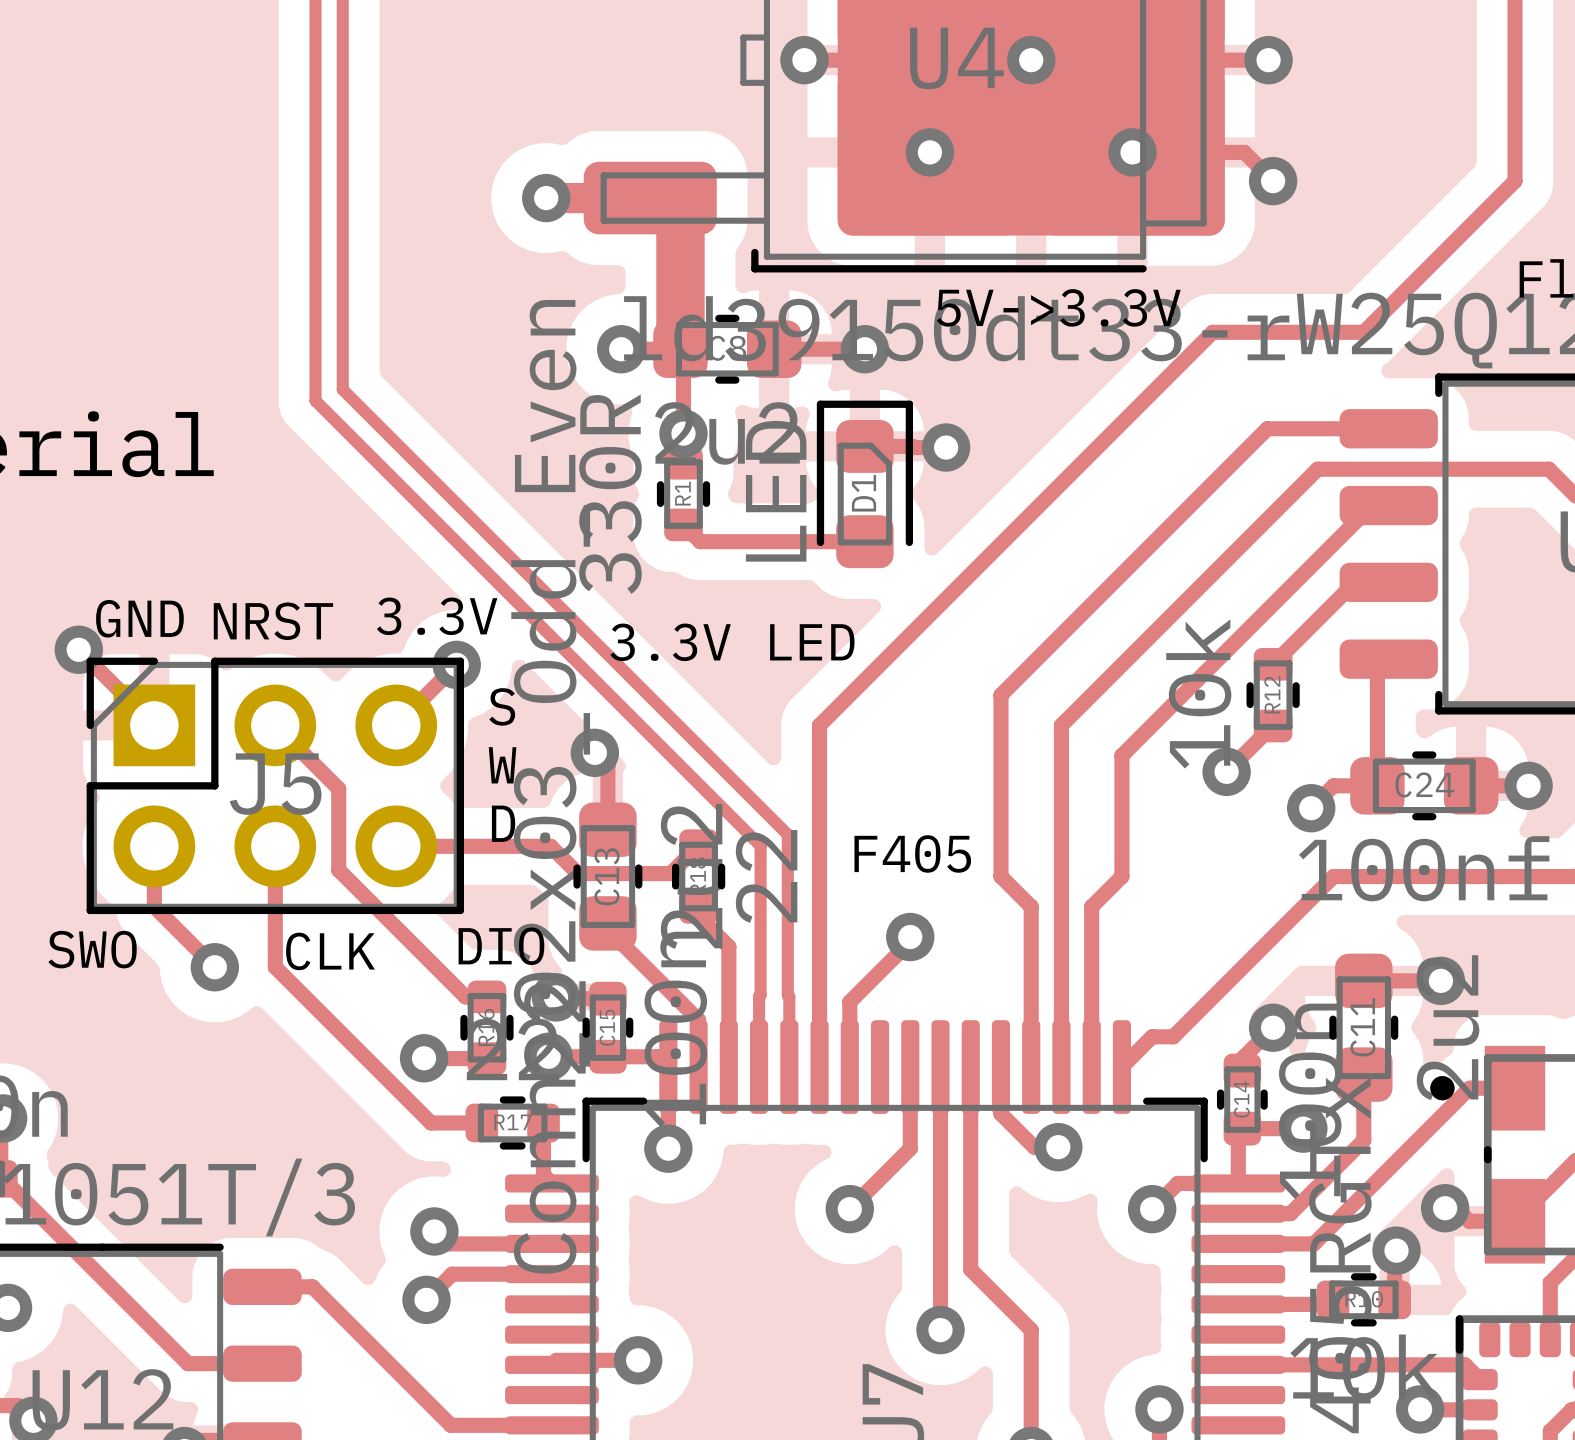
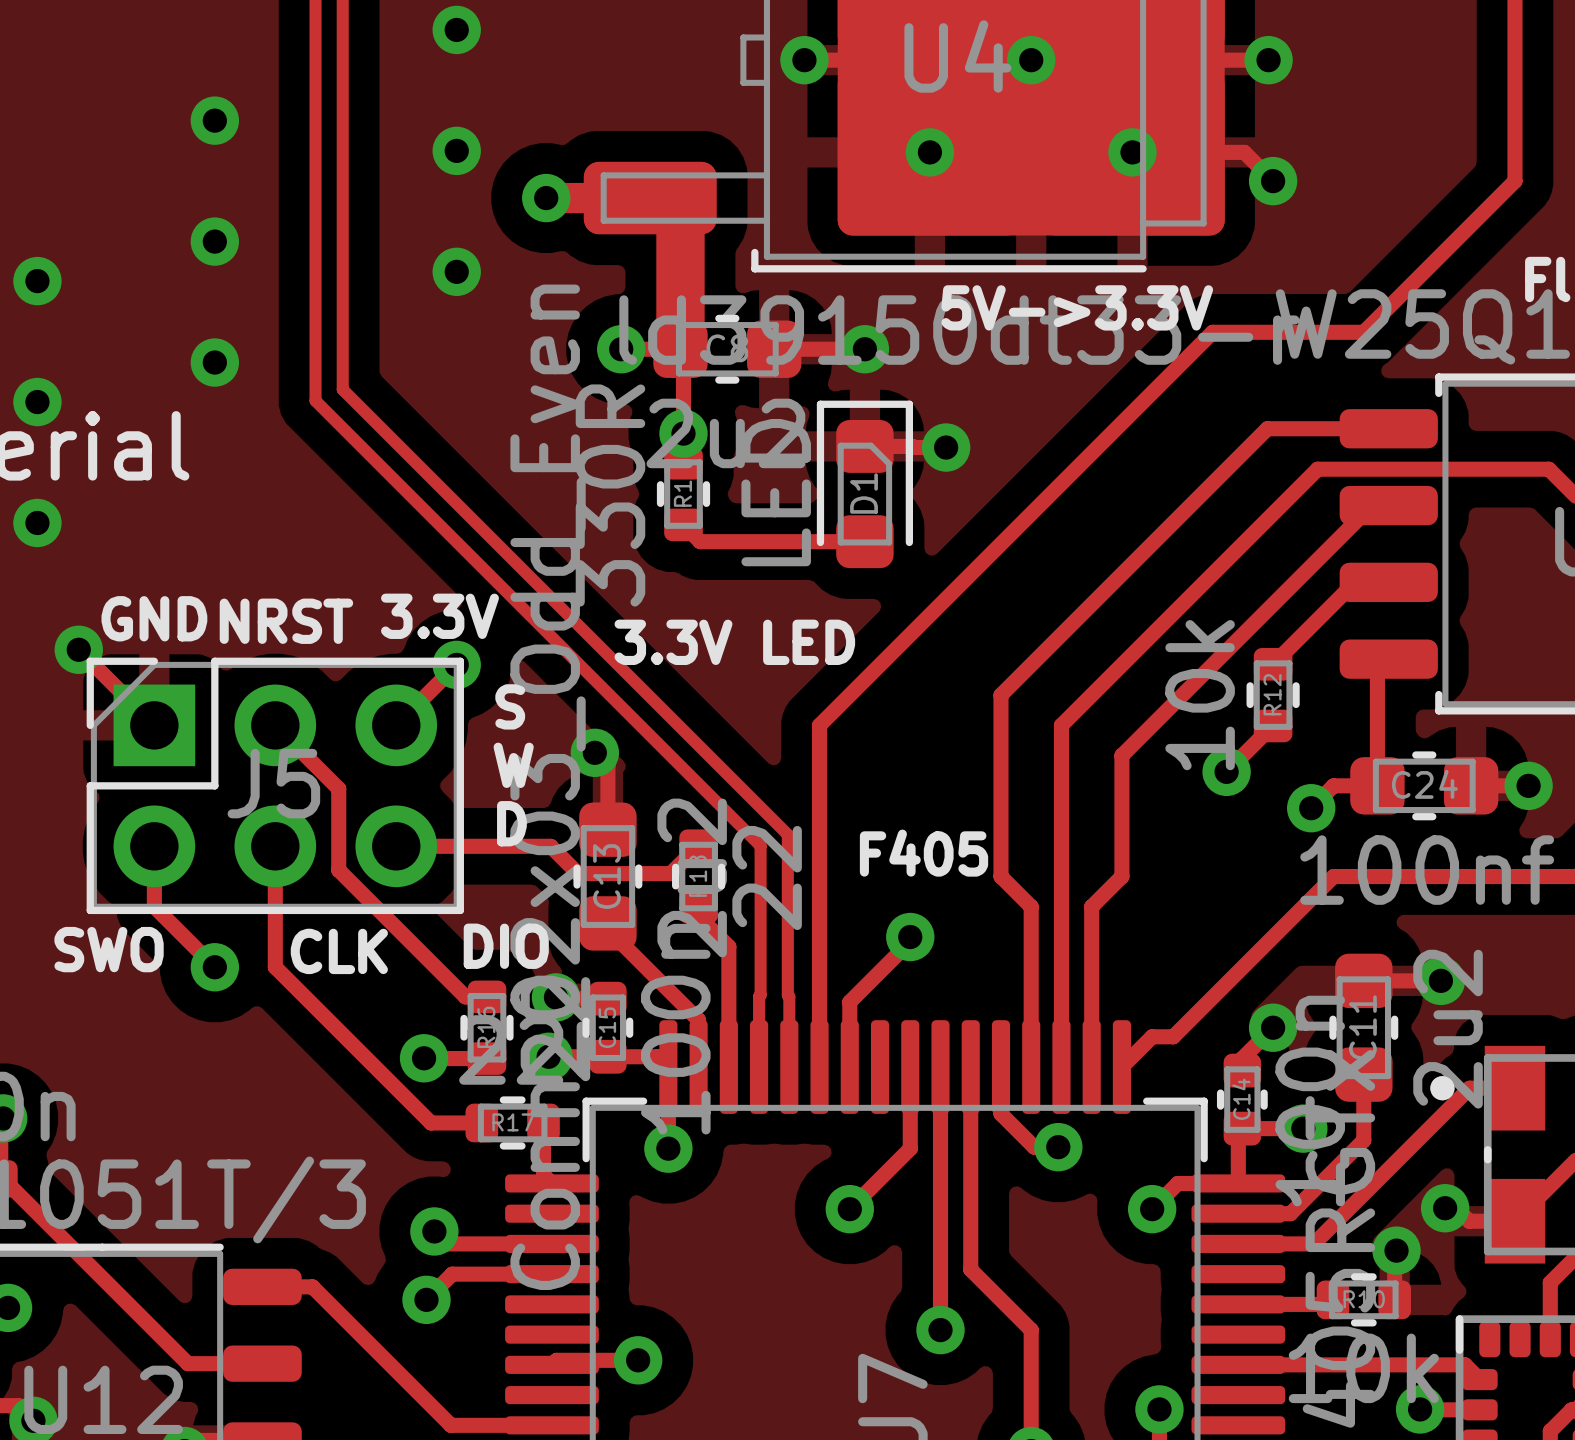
via: none -> (456, 29)
via: none -> (214, 120)
via: none -> (456, 150)
via: none -> (214, 241)
via: none -> (456, 271)
via: none -> (37, 281)
via: none -> (214, 362)
via: none -> (37, 402)
via: none -> (37, 522)

